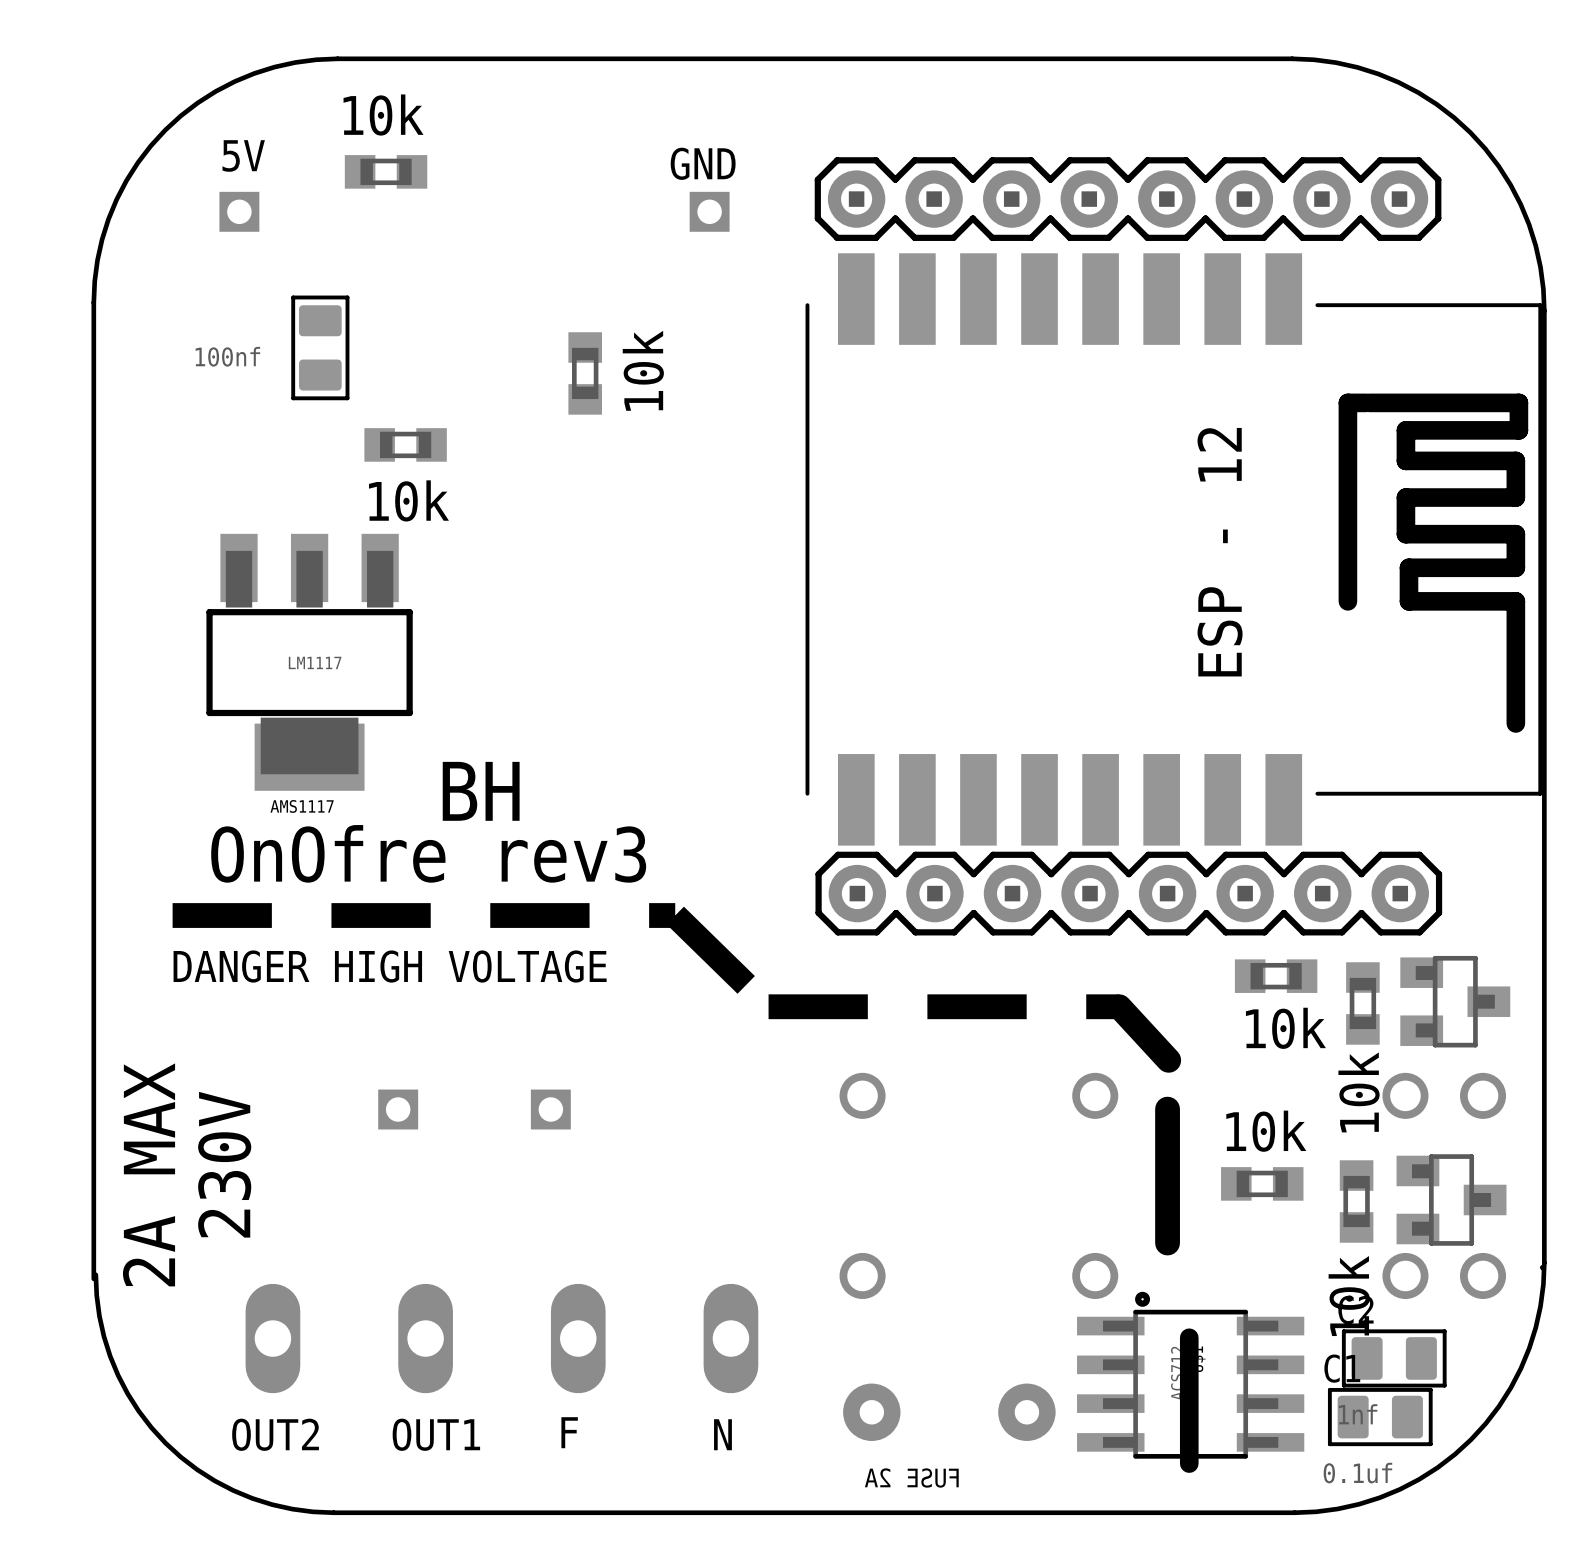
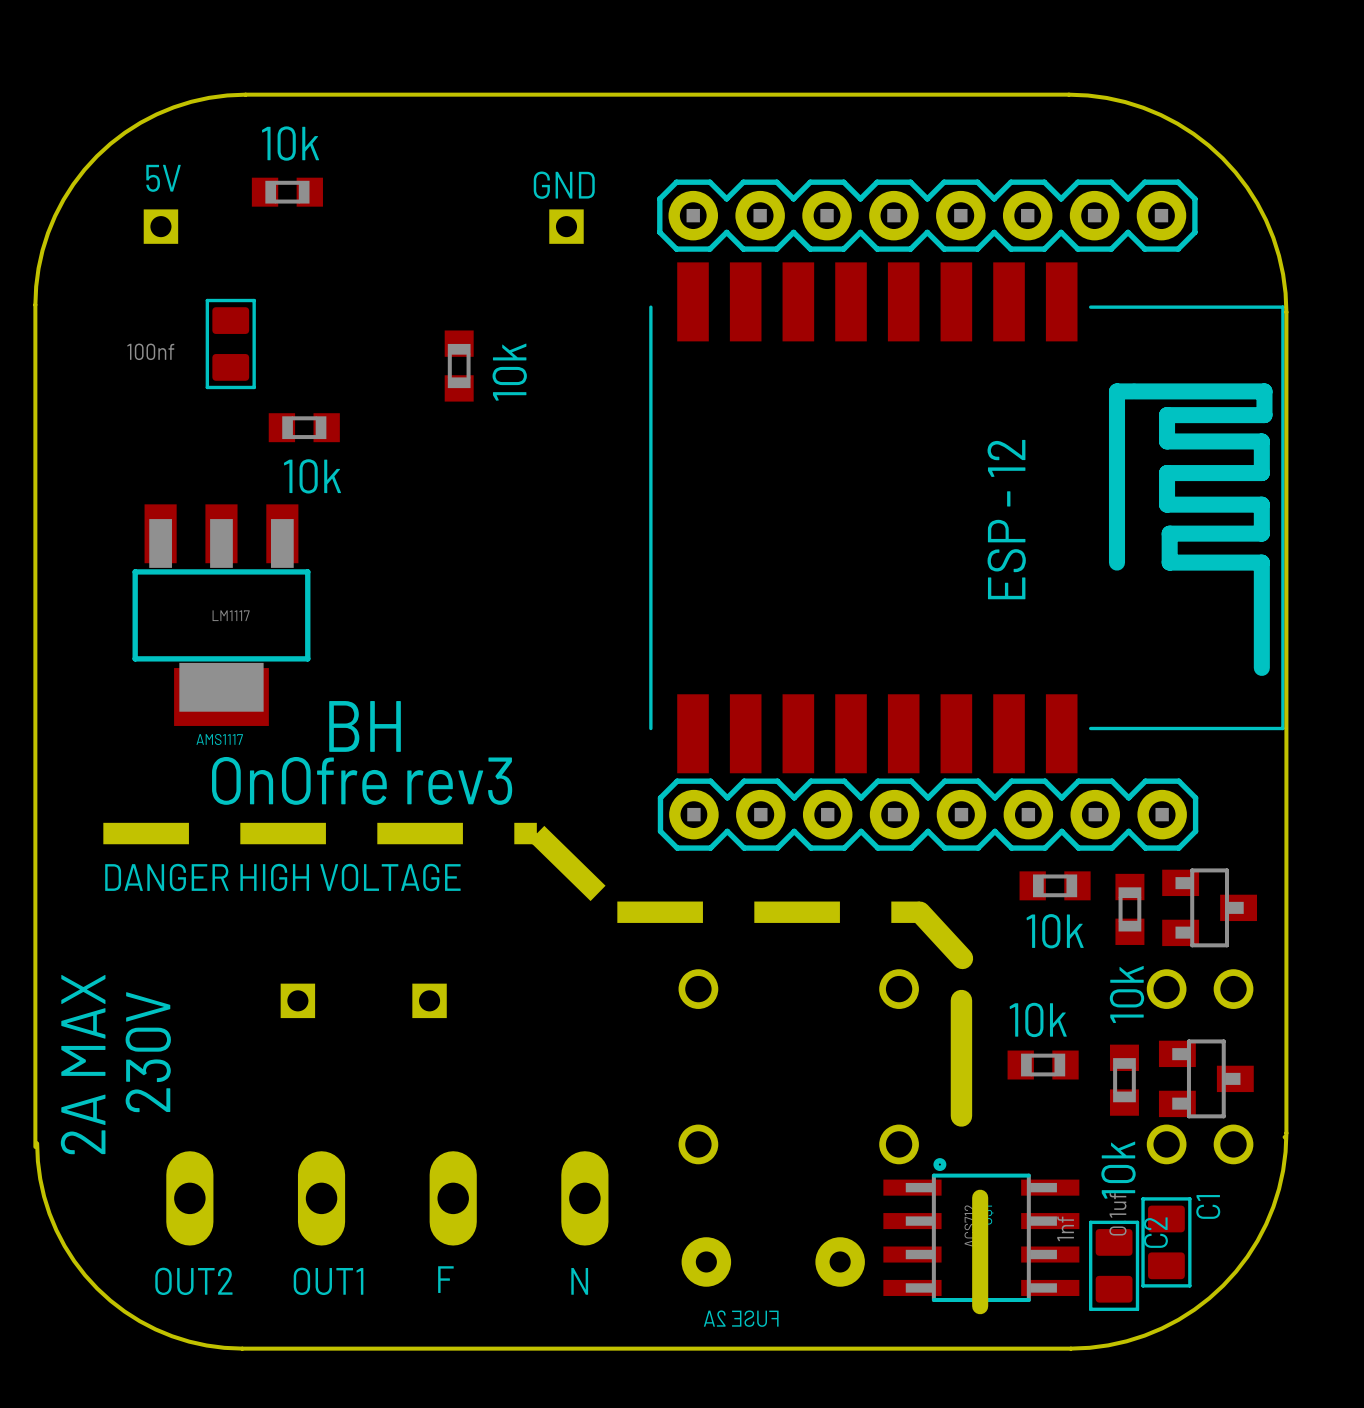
C2 rotation: 0° (1394, 1358) -> 90° clockwise (1114, 1265)
C2 position: (1394, 1358) -> (1114, 1265)
C1 rotation: 0° (1380, 1417) -> 90° clockwise (1166, 1242)

